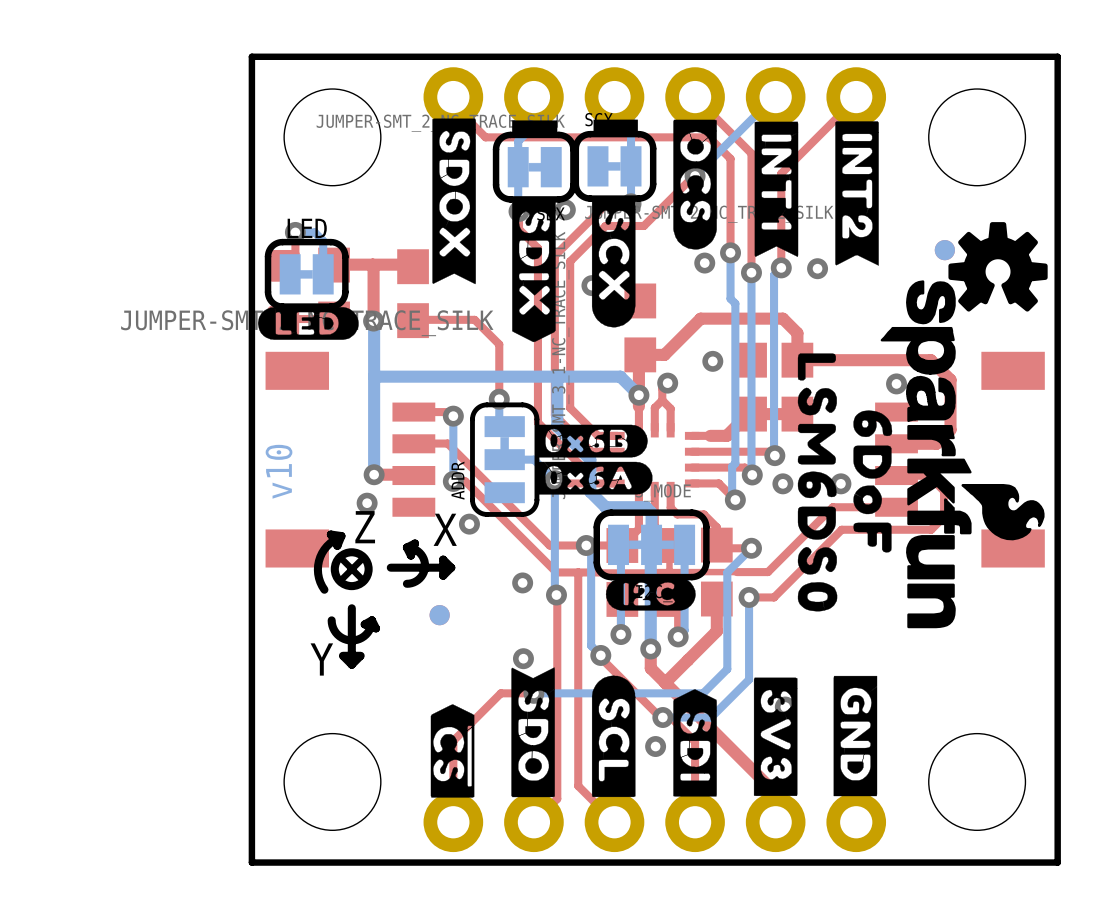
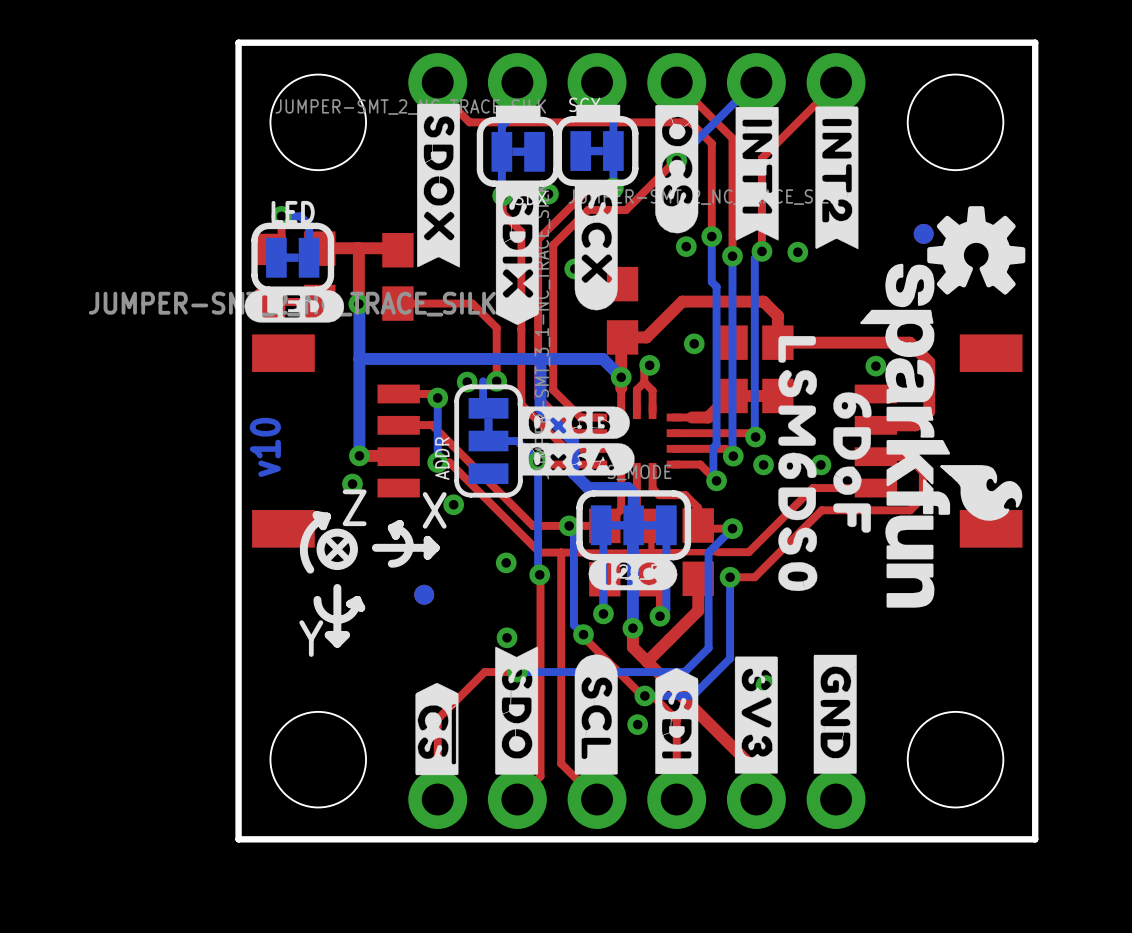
top track: (413, 320) (474, 319) (499, 344) (499, 399) -> (397, 303) (472, 303) (496, 327) (496, 381)
via: (499, 399) -> none
via: none -> (496, 381)
via: none -> (467, 382)

